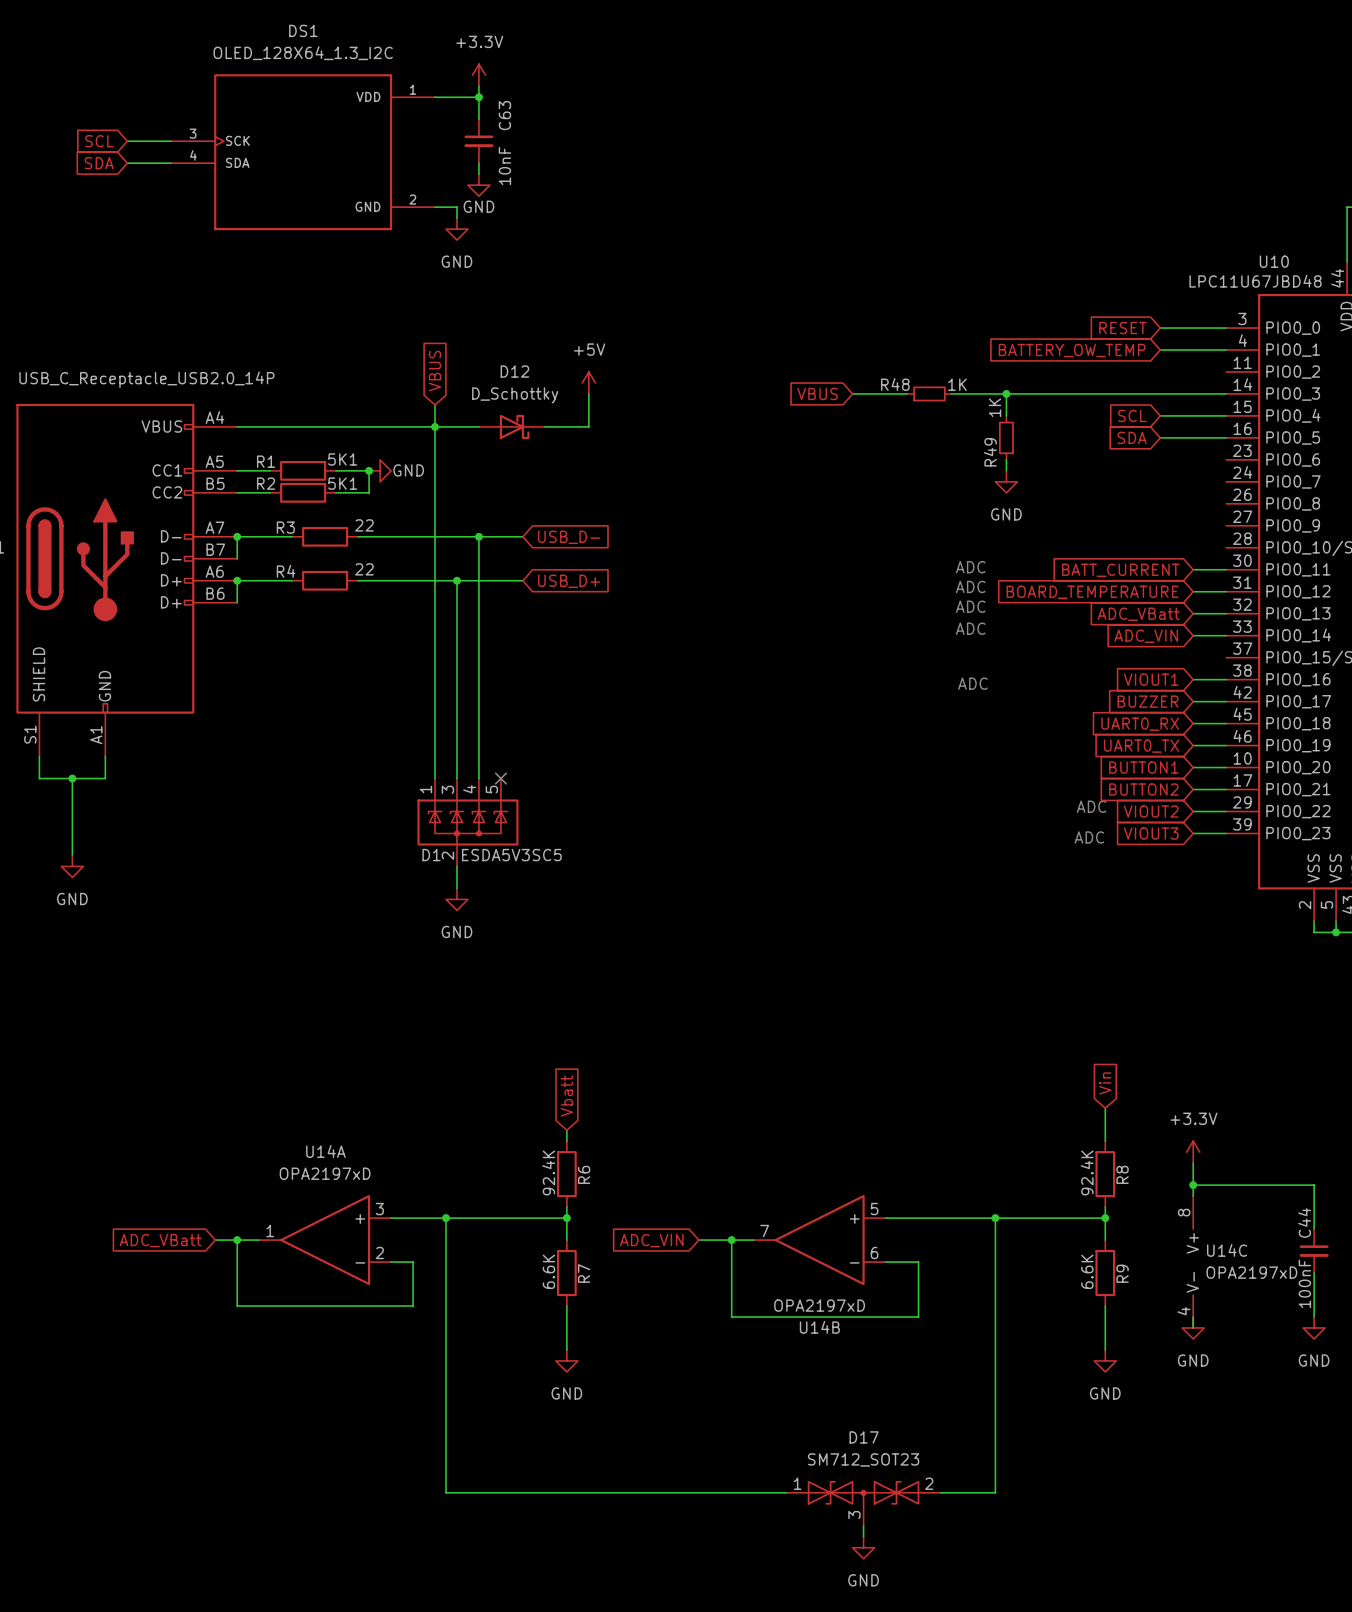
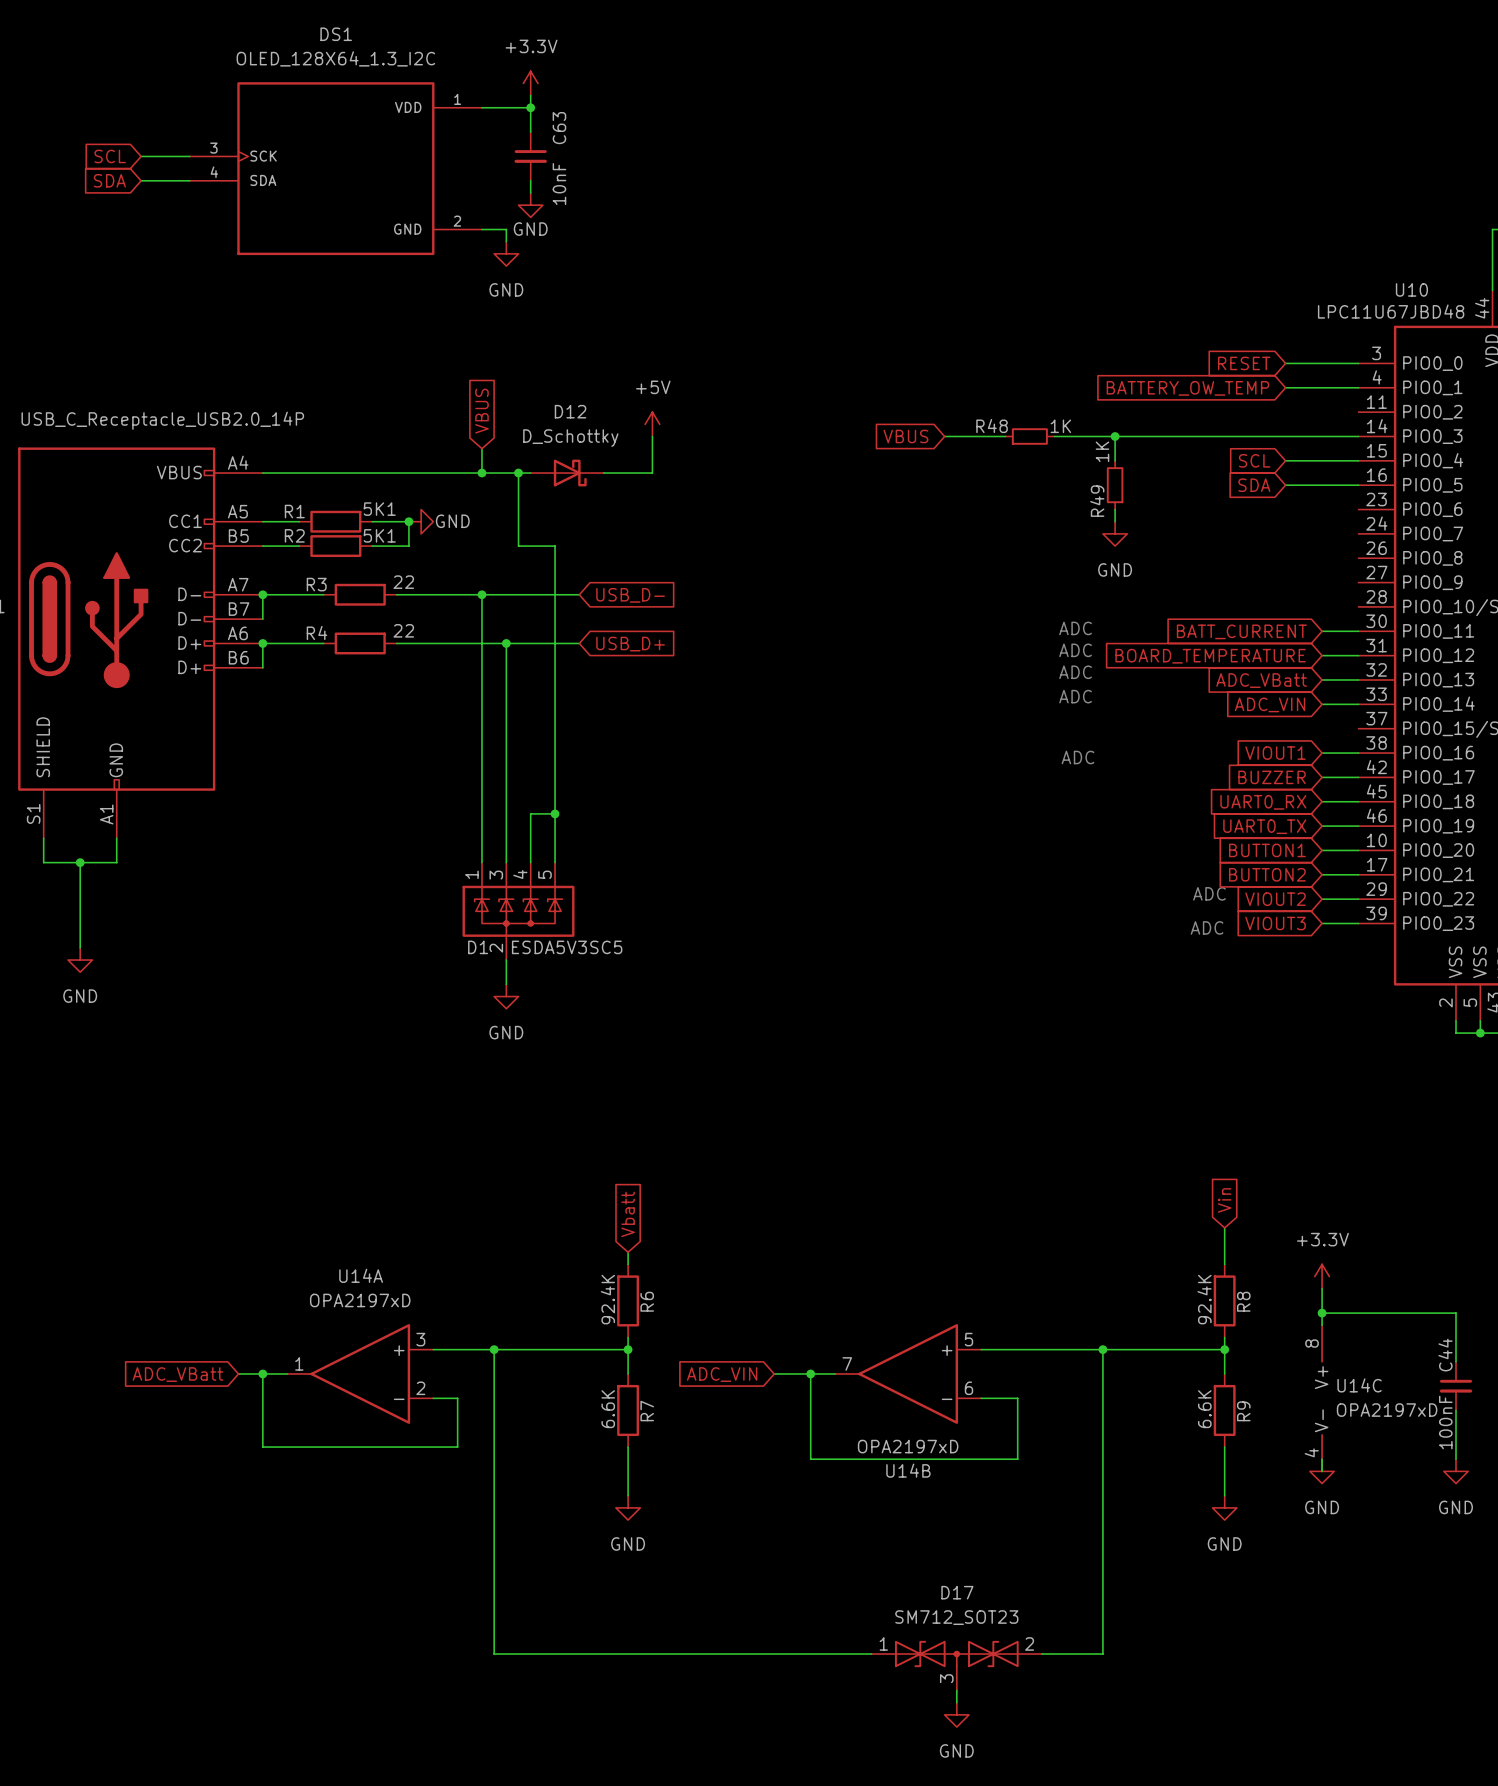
wire: (435, 426) (435, 536) -> none
wire: none -> (518, 473) (518, 546) (555, 546) (555, 862)
junction: none -> (518, 473)
wire: (478, 536) (478, 734) -> (555, 813) (530, 813)
junction position: (478, 536) -> (481, 594)
junction: none -> (555, 813)
no-connect mark: (500, 778) -> none

